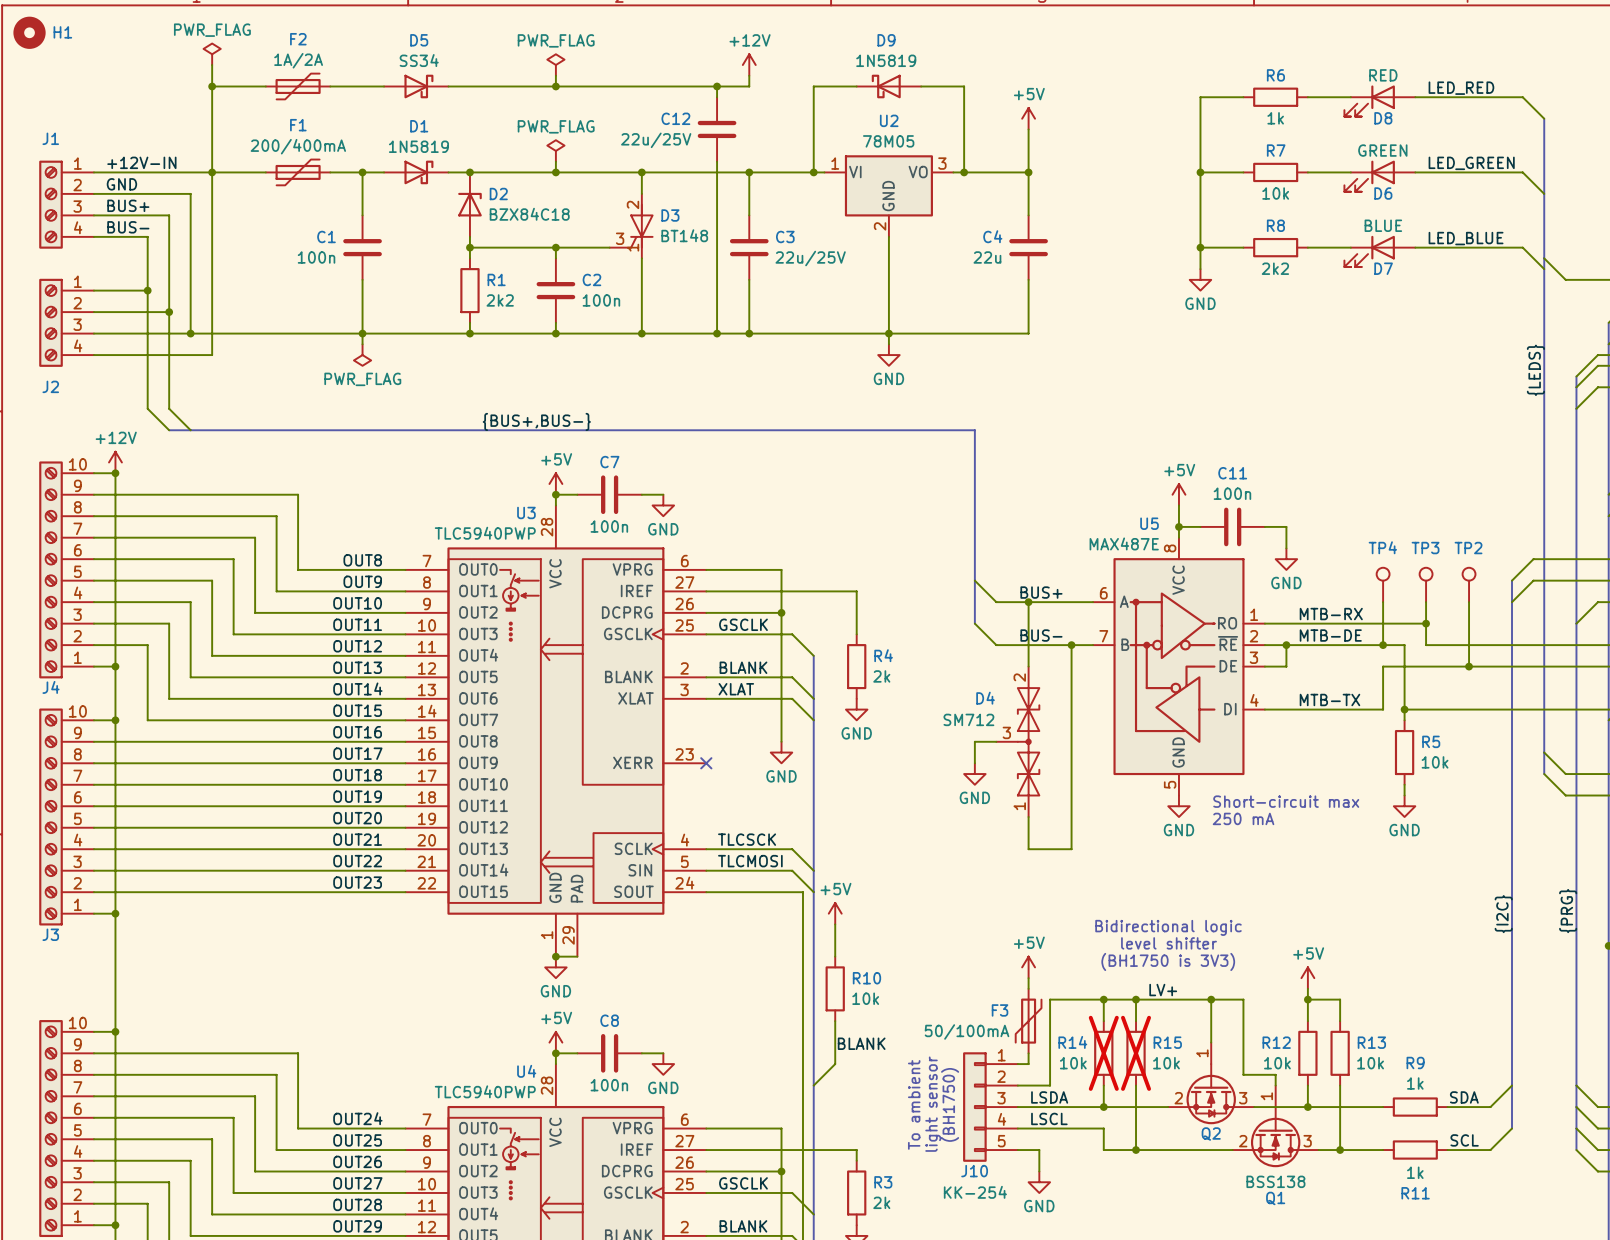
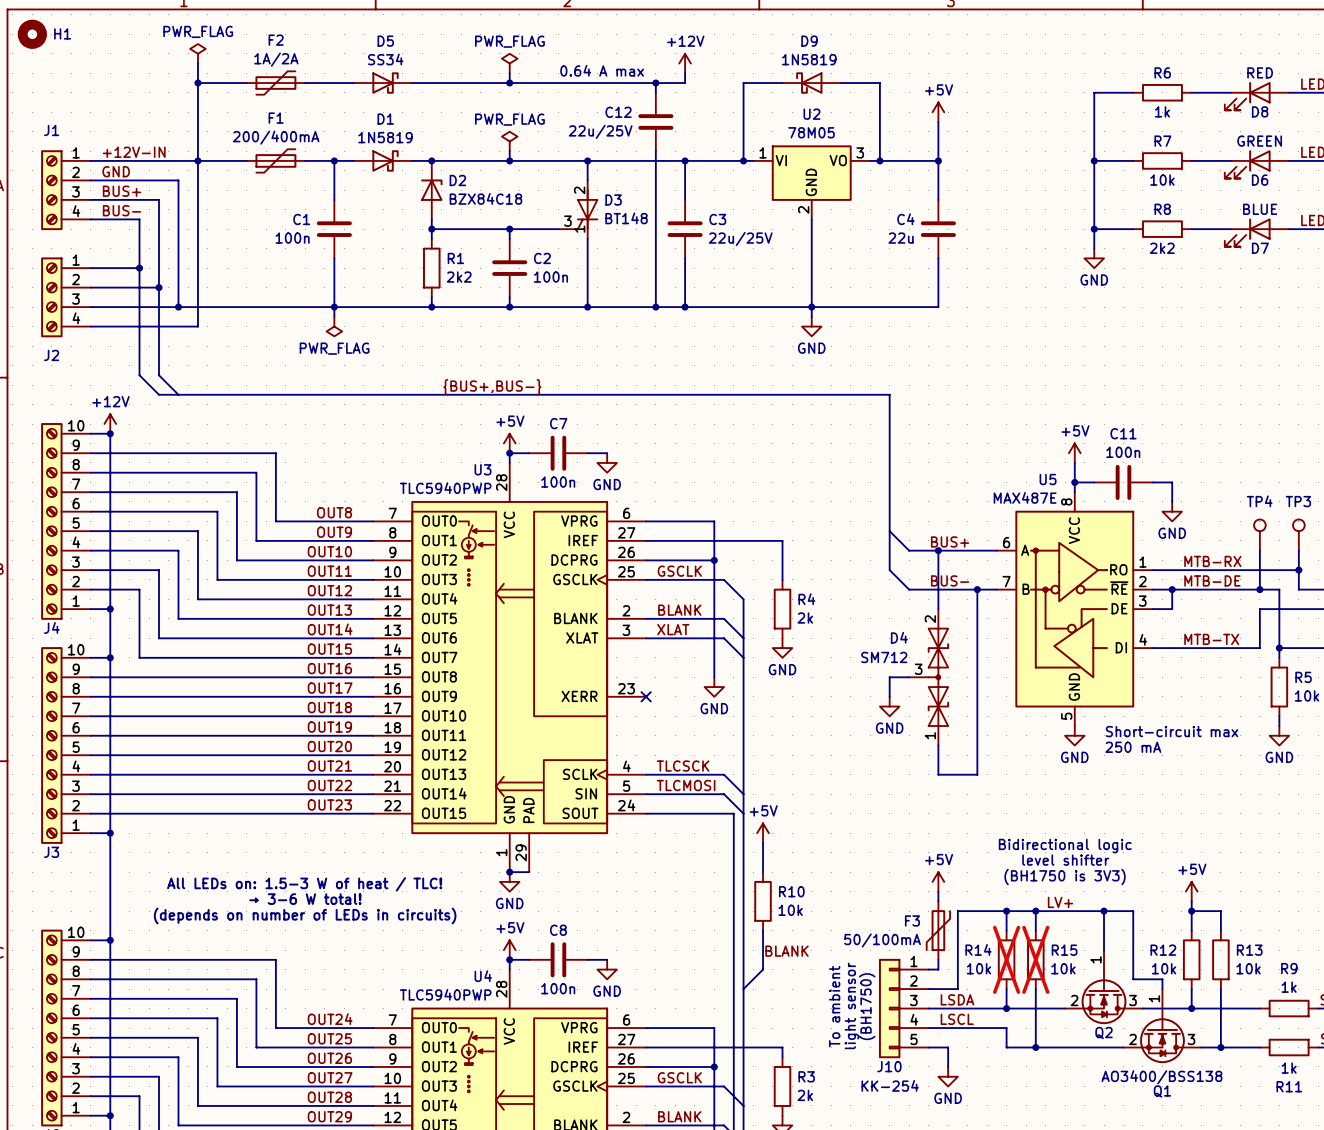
text: none -> 0.64 A max (602, 70)
text: none -> All LEDs on: 1.5-3 W of heat / TLC! (304, 884)
text: none -> → 3-6 W total! (305, 899)
text: none -> (depends on number of LEDs in circuits) (305, 915)
Q1 value: BSS138 (1275, 1181) -> AO3400/BSS138 (1161, 1077)

